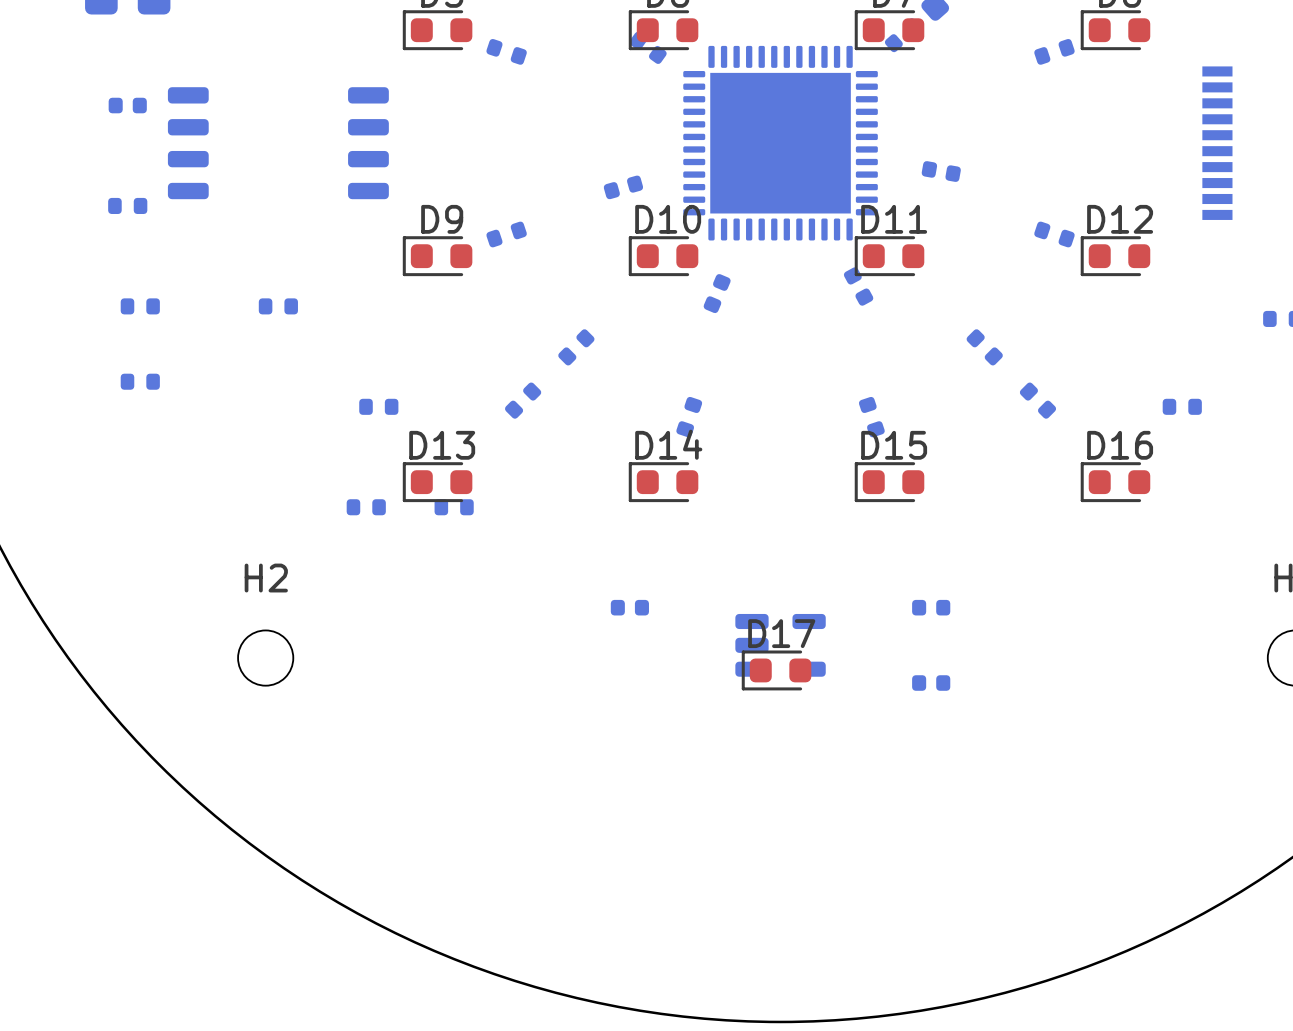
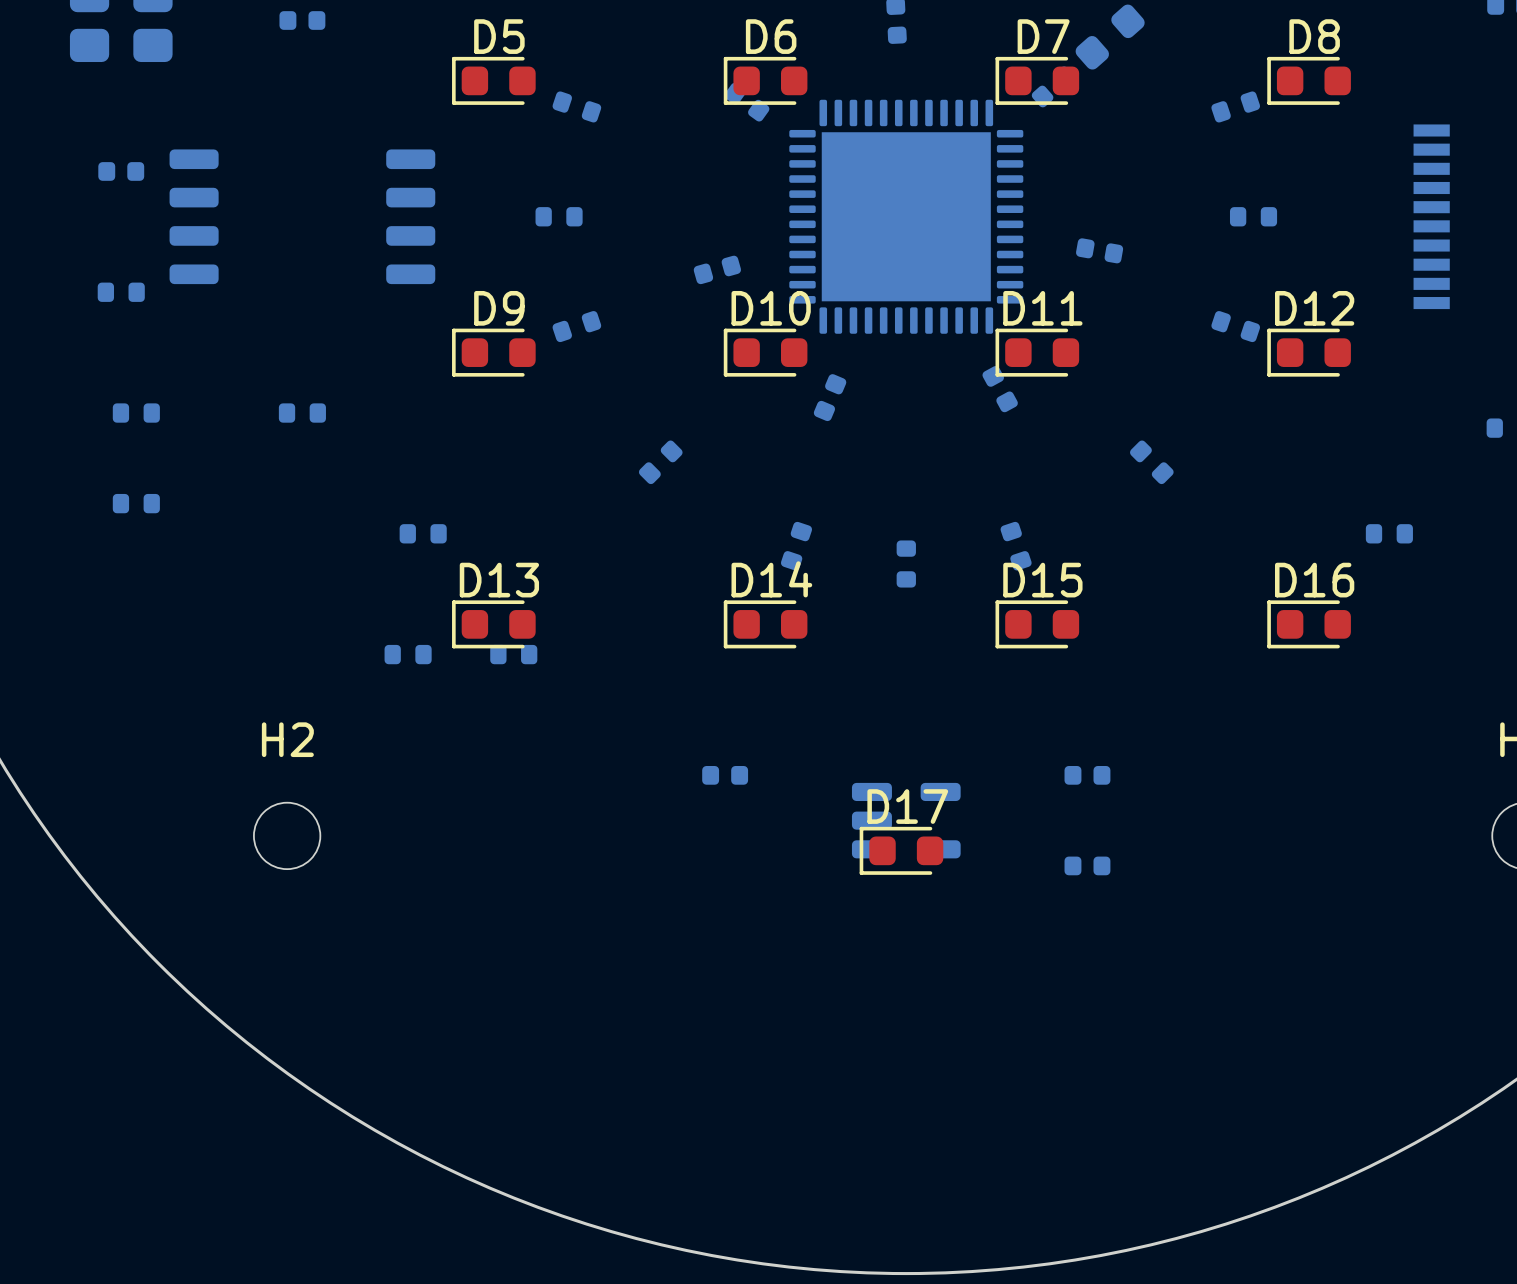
part: none -> (559, 216)
part: none -> (1253, 216)
part: (523, 400) -> none
part: (1037, 400) -> none
part: none -> (906, 563)

